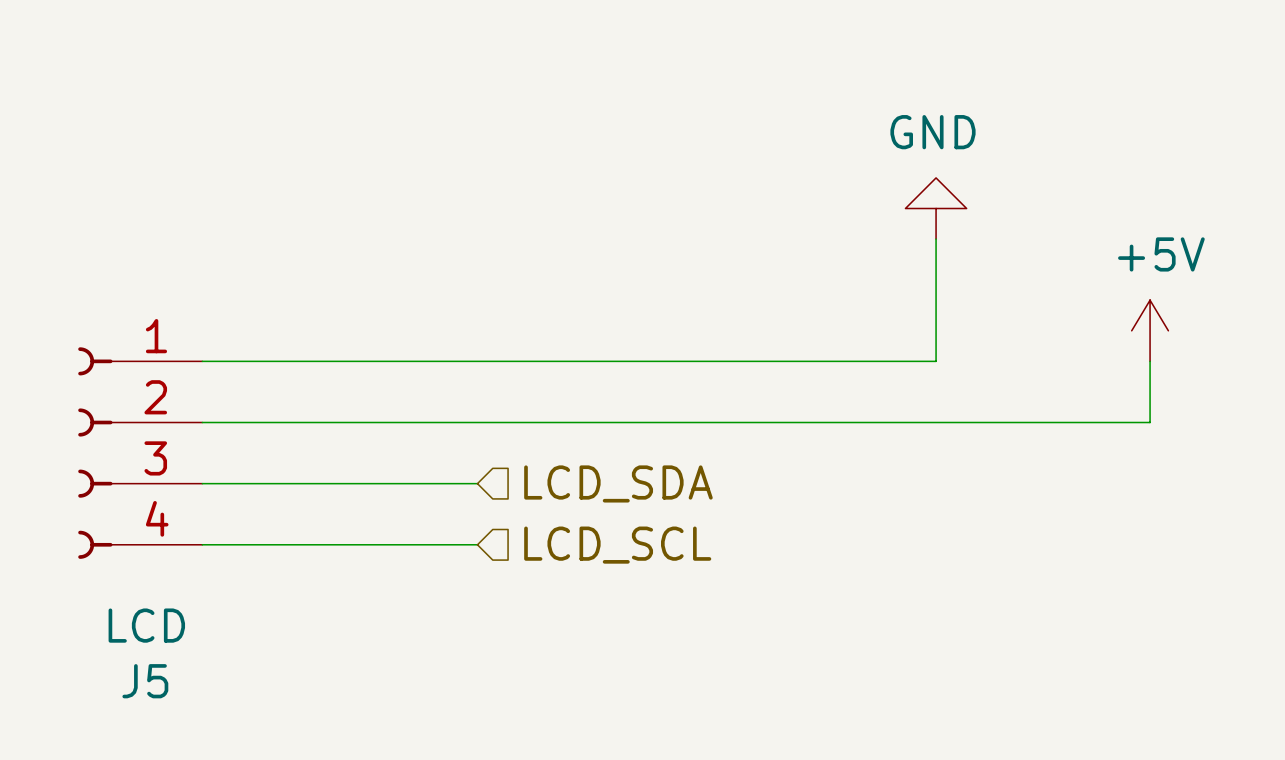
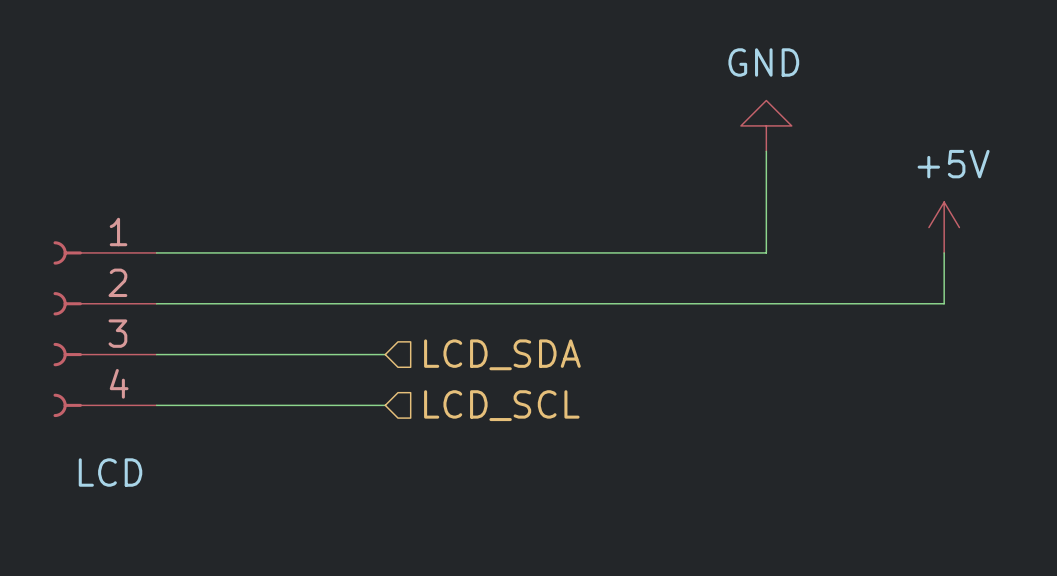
J5 name: J5 (145, 681) -> none

